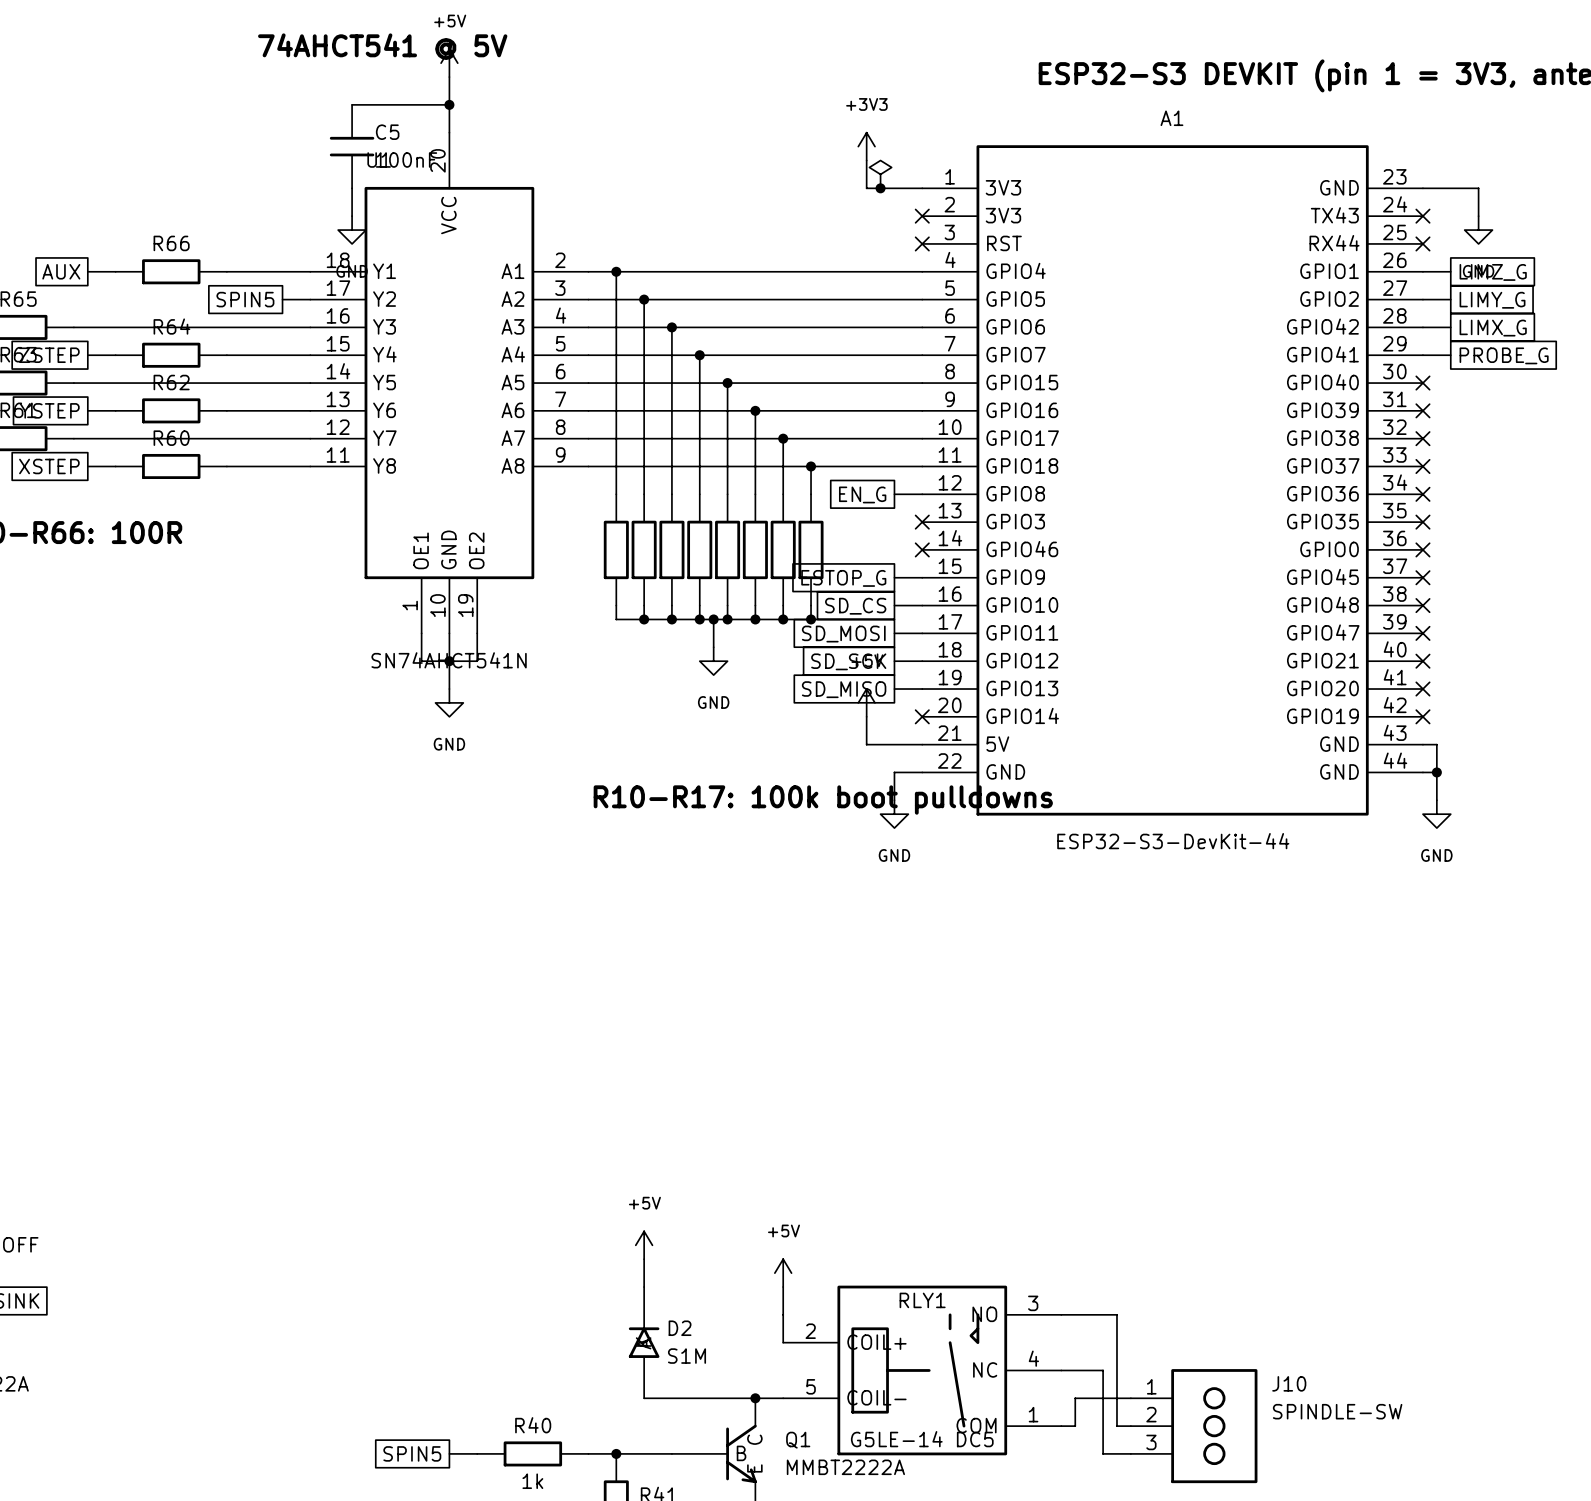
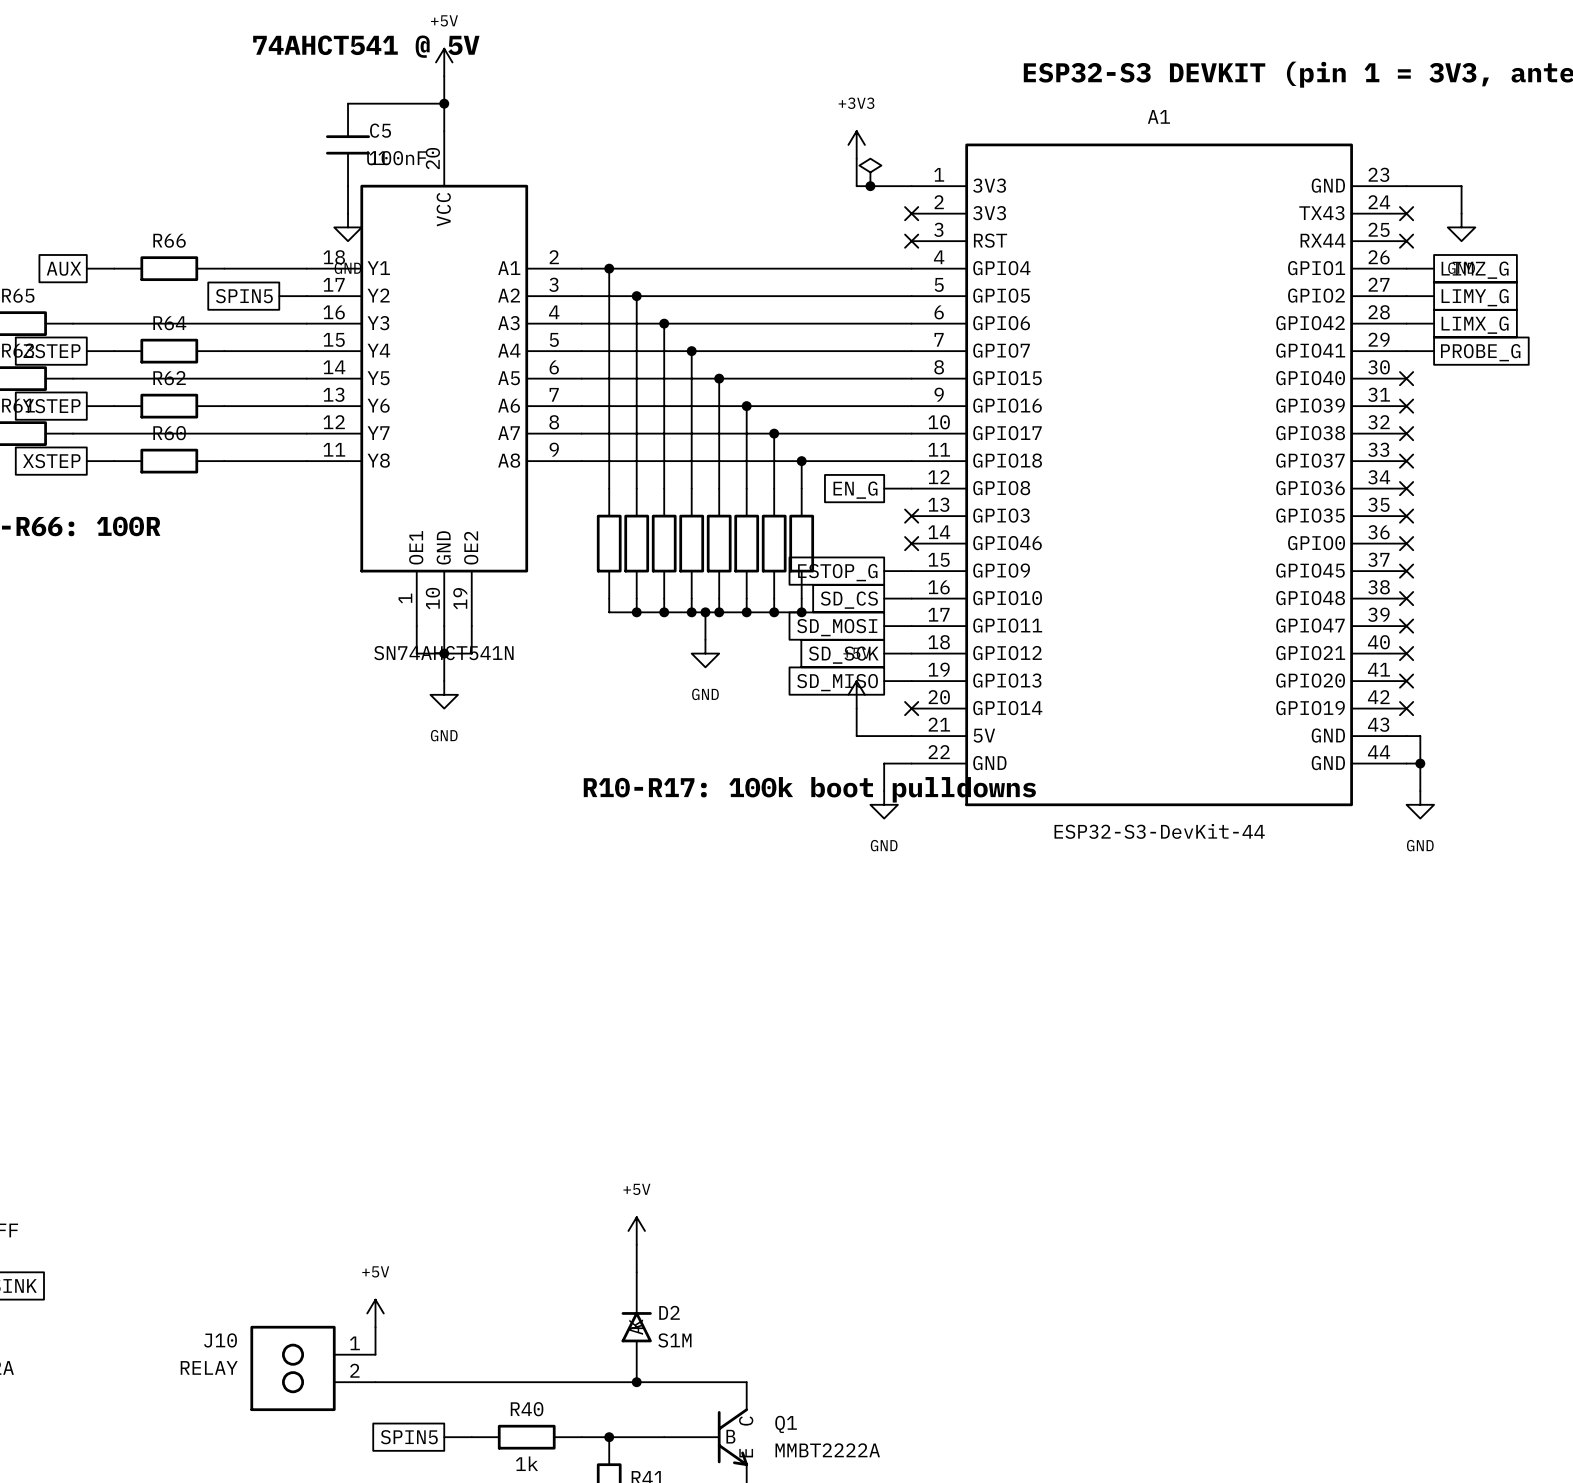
power symbol: +5V (783, 1273) -> none
wire: (783, 1287) (783, 1342) -> none
wire: (1061, 1314) (1116, 1314) (1116, 1426) (1130, 1426) -> none
power symbol: none -> +5V (375, 1313)
wire: none -> (375, 1327) (375, 1354)
J10 symbol: [1130, 1369, 1258, 1484] -> [250, 1325, 376, 1412]
RLY1: G5LE-14 DC5 (922, 1370) -> none
wire: (1061, 1370) (1103, 1370) (1103, 1453) (1130, 1453) -> none
J10 name position: J10 (1289, 1383) -> J10 (220, 1340)
wire: none -> (375, 1382) (636, 1382)
junction: none -> (636, 1382)
wire: (755, 1398) (783, 1398) -> none
junction: (755, 1398) -> none
wire: (1130, 1398) (1075, 1398) (1075, 1426) (1061, 1426) -> none
J10 value: SPINDLE-SW (1337, 1411) -> RELAY (209, 1367)

